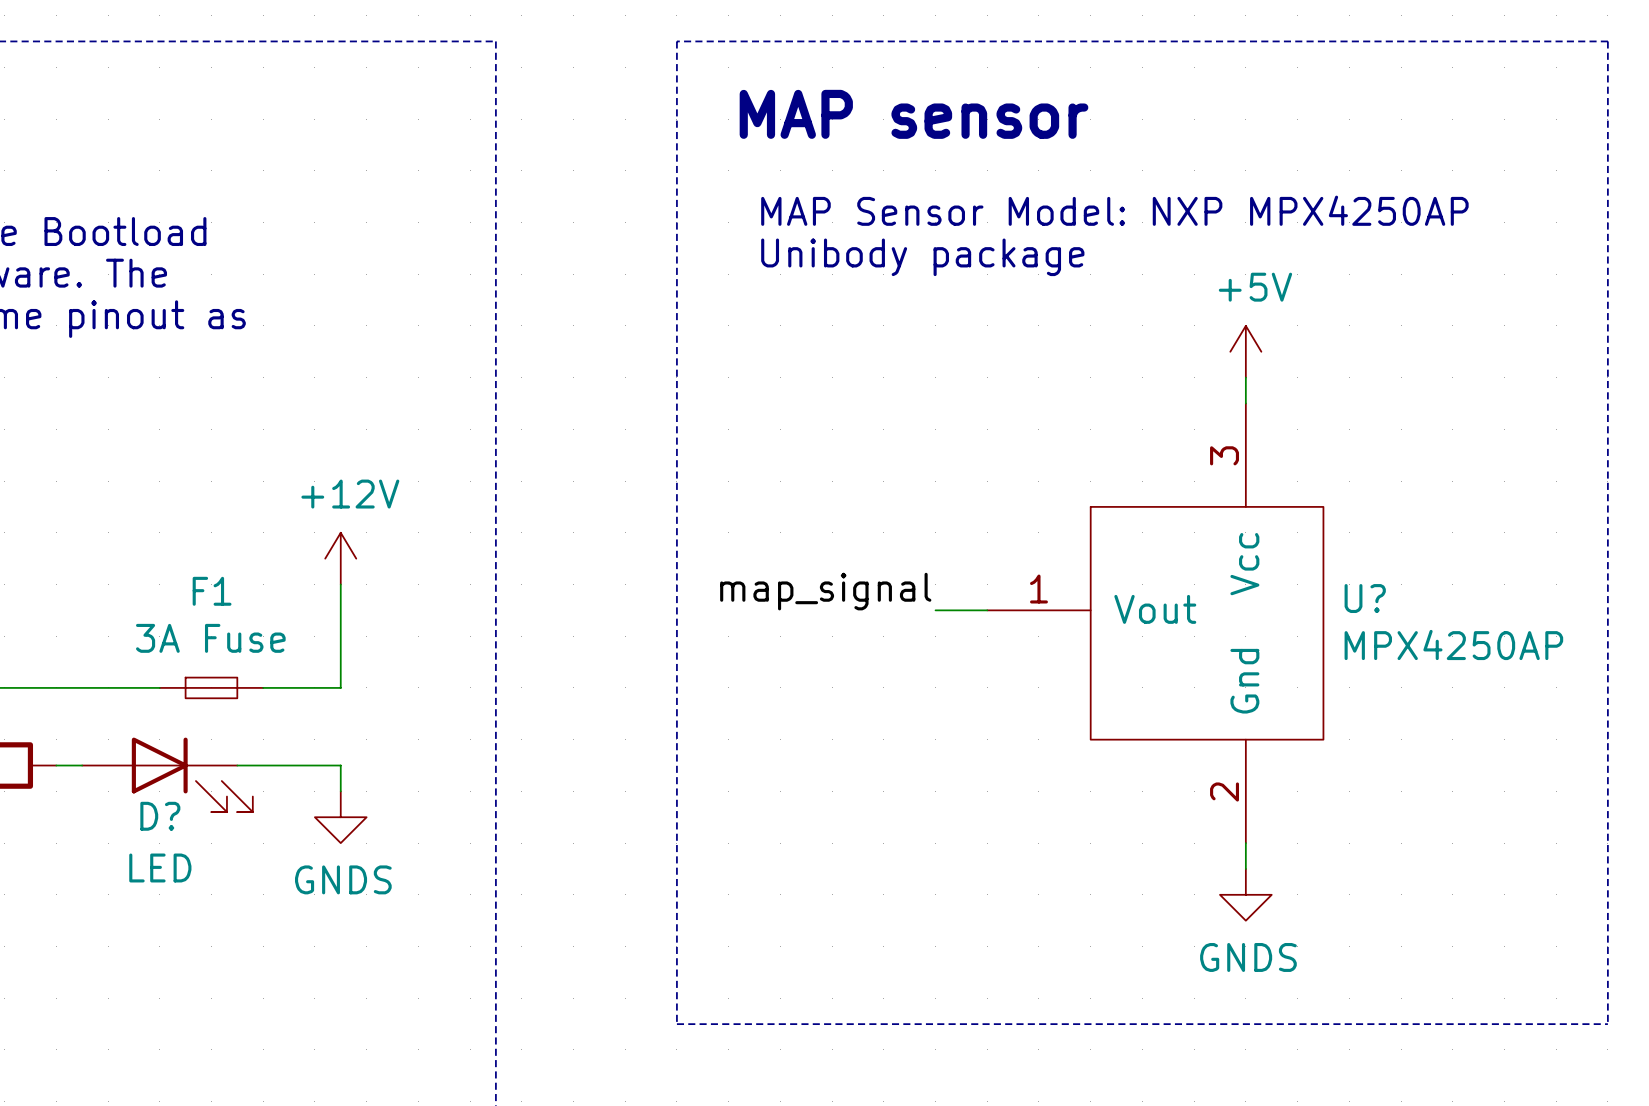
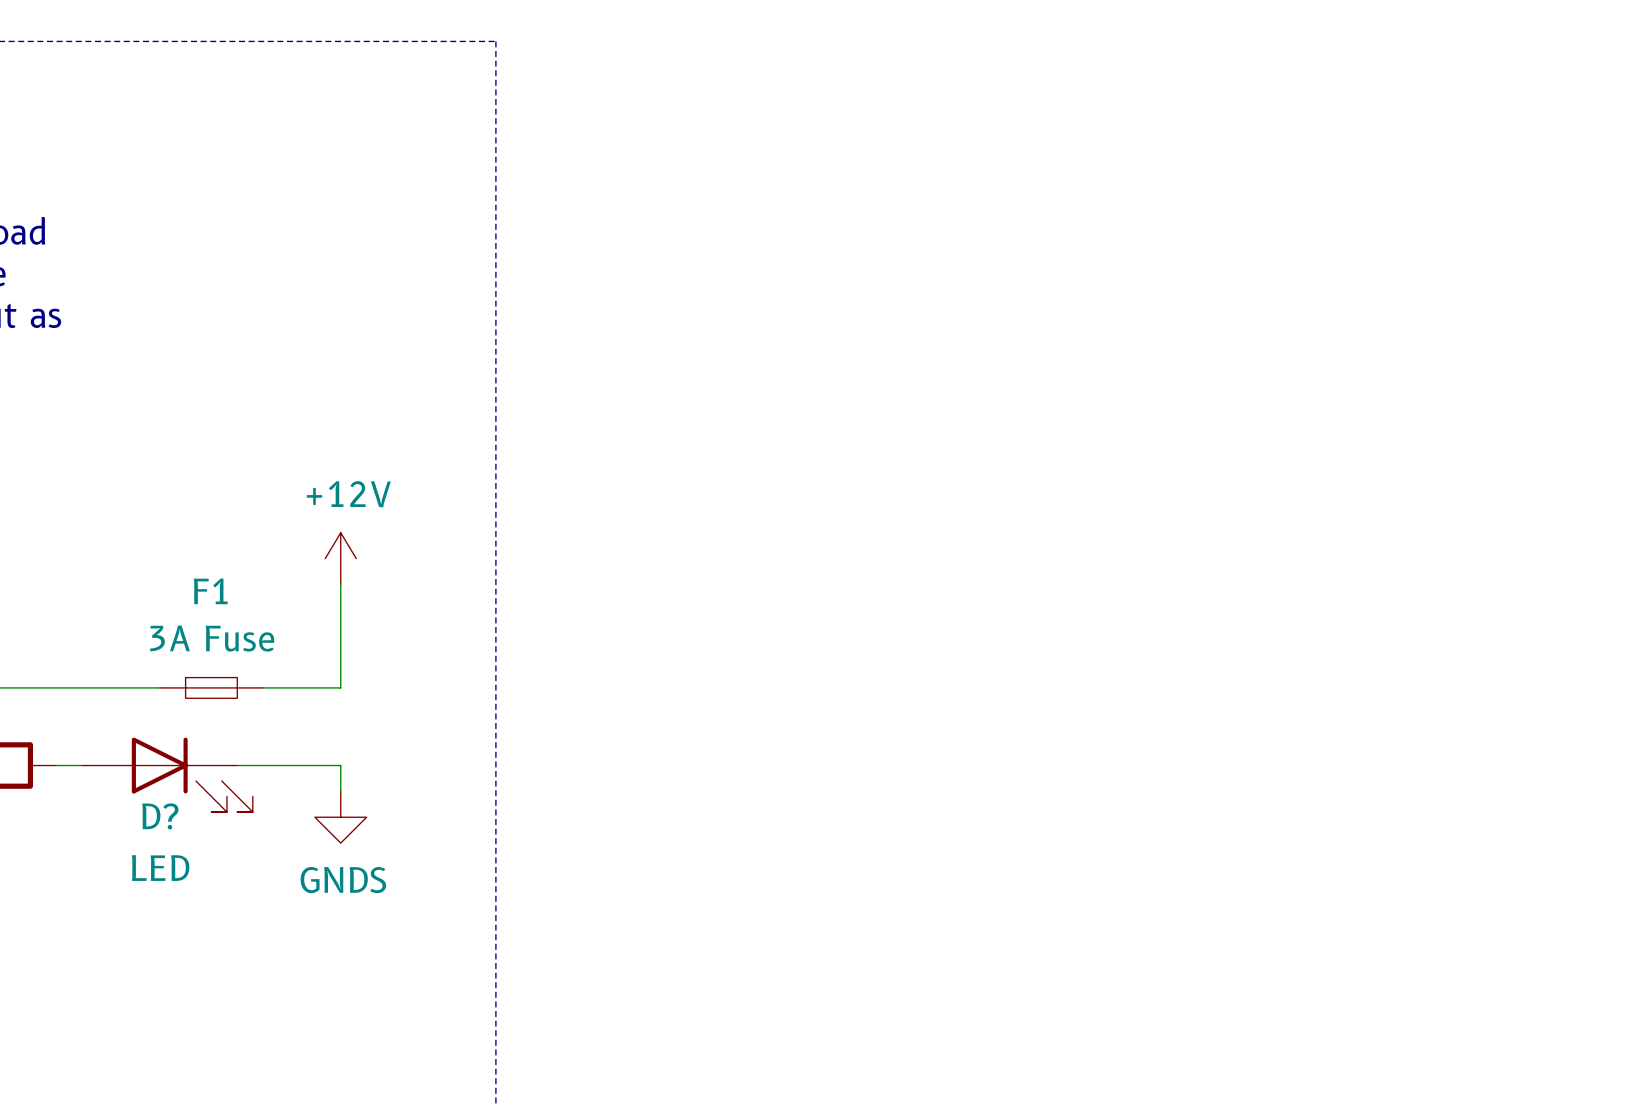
line: (676, 41) (1607, 41) (1607, 1024) (676, 1024) (676, 41) -> none
text: MAP sensor (914, 114) -> none
text: MAP Sensor Model: NXP MPX4250AP (1114, 210) -> none
text: Unibody package (922, 257) -> none
power symbol: +5V (1245, 351) -> none
wire: (1245, 377) (1245, 403) -> none
label: map_signal (825, 591) -> none
wire: (935, 610) (987, 610) -> none
U?: MPX4250AP (1155, 623) -> none
wire: (1245, 843) (1245, 868) -> none
power symbol: GNDS (1245, 894) -> none

